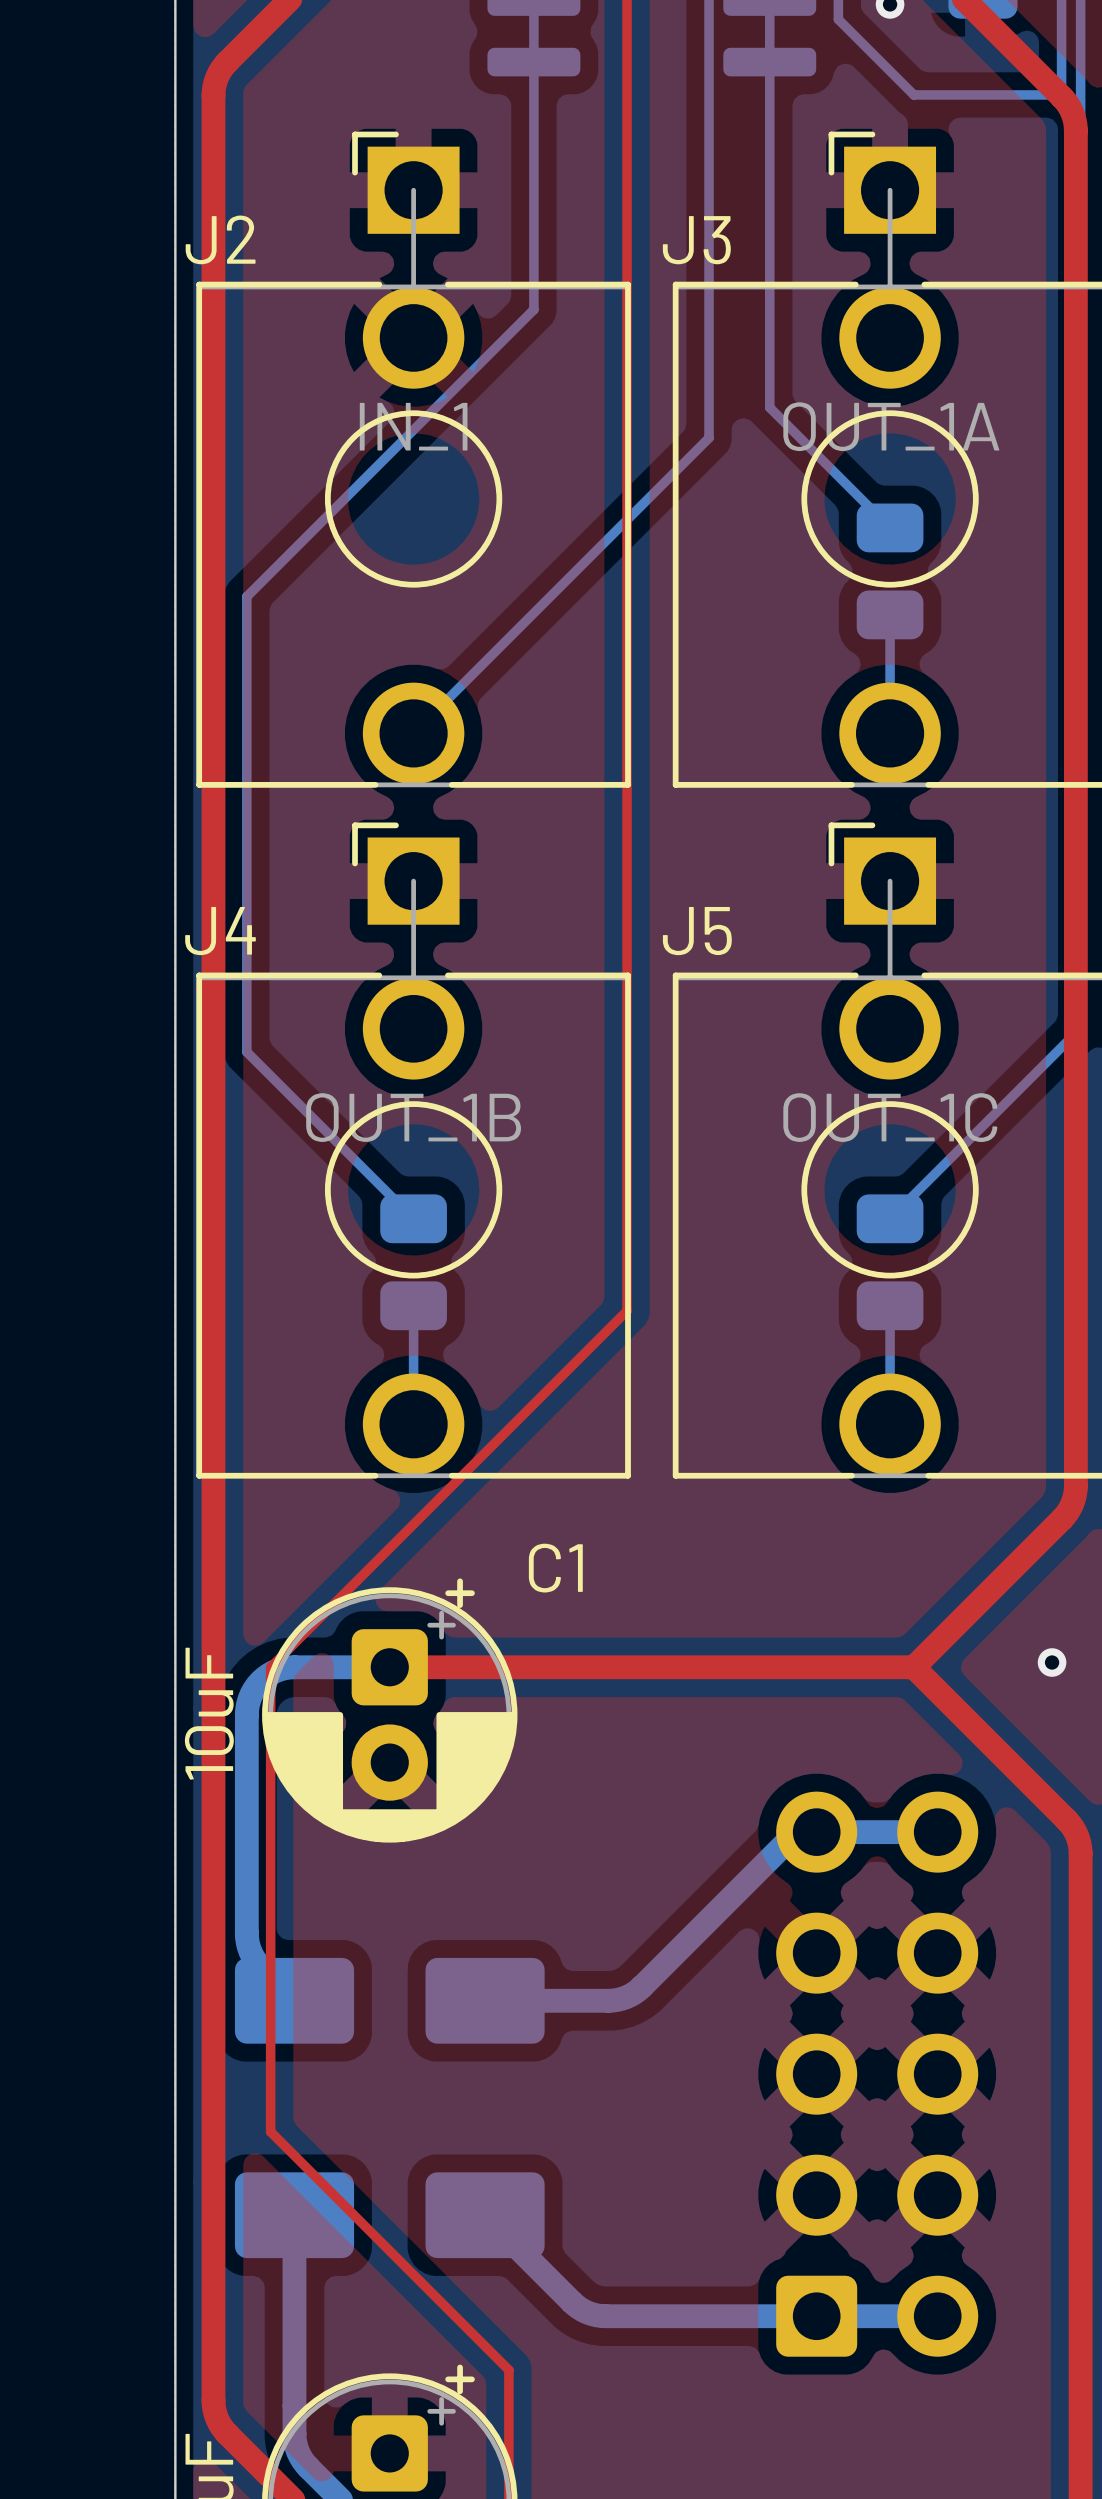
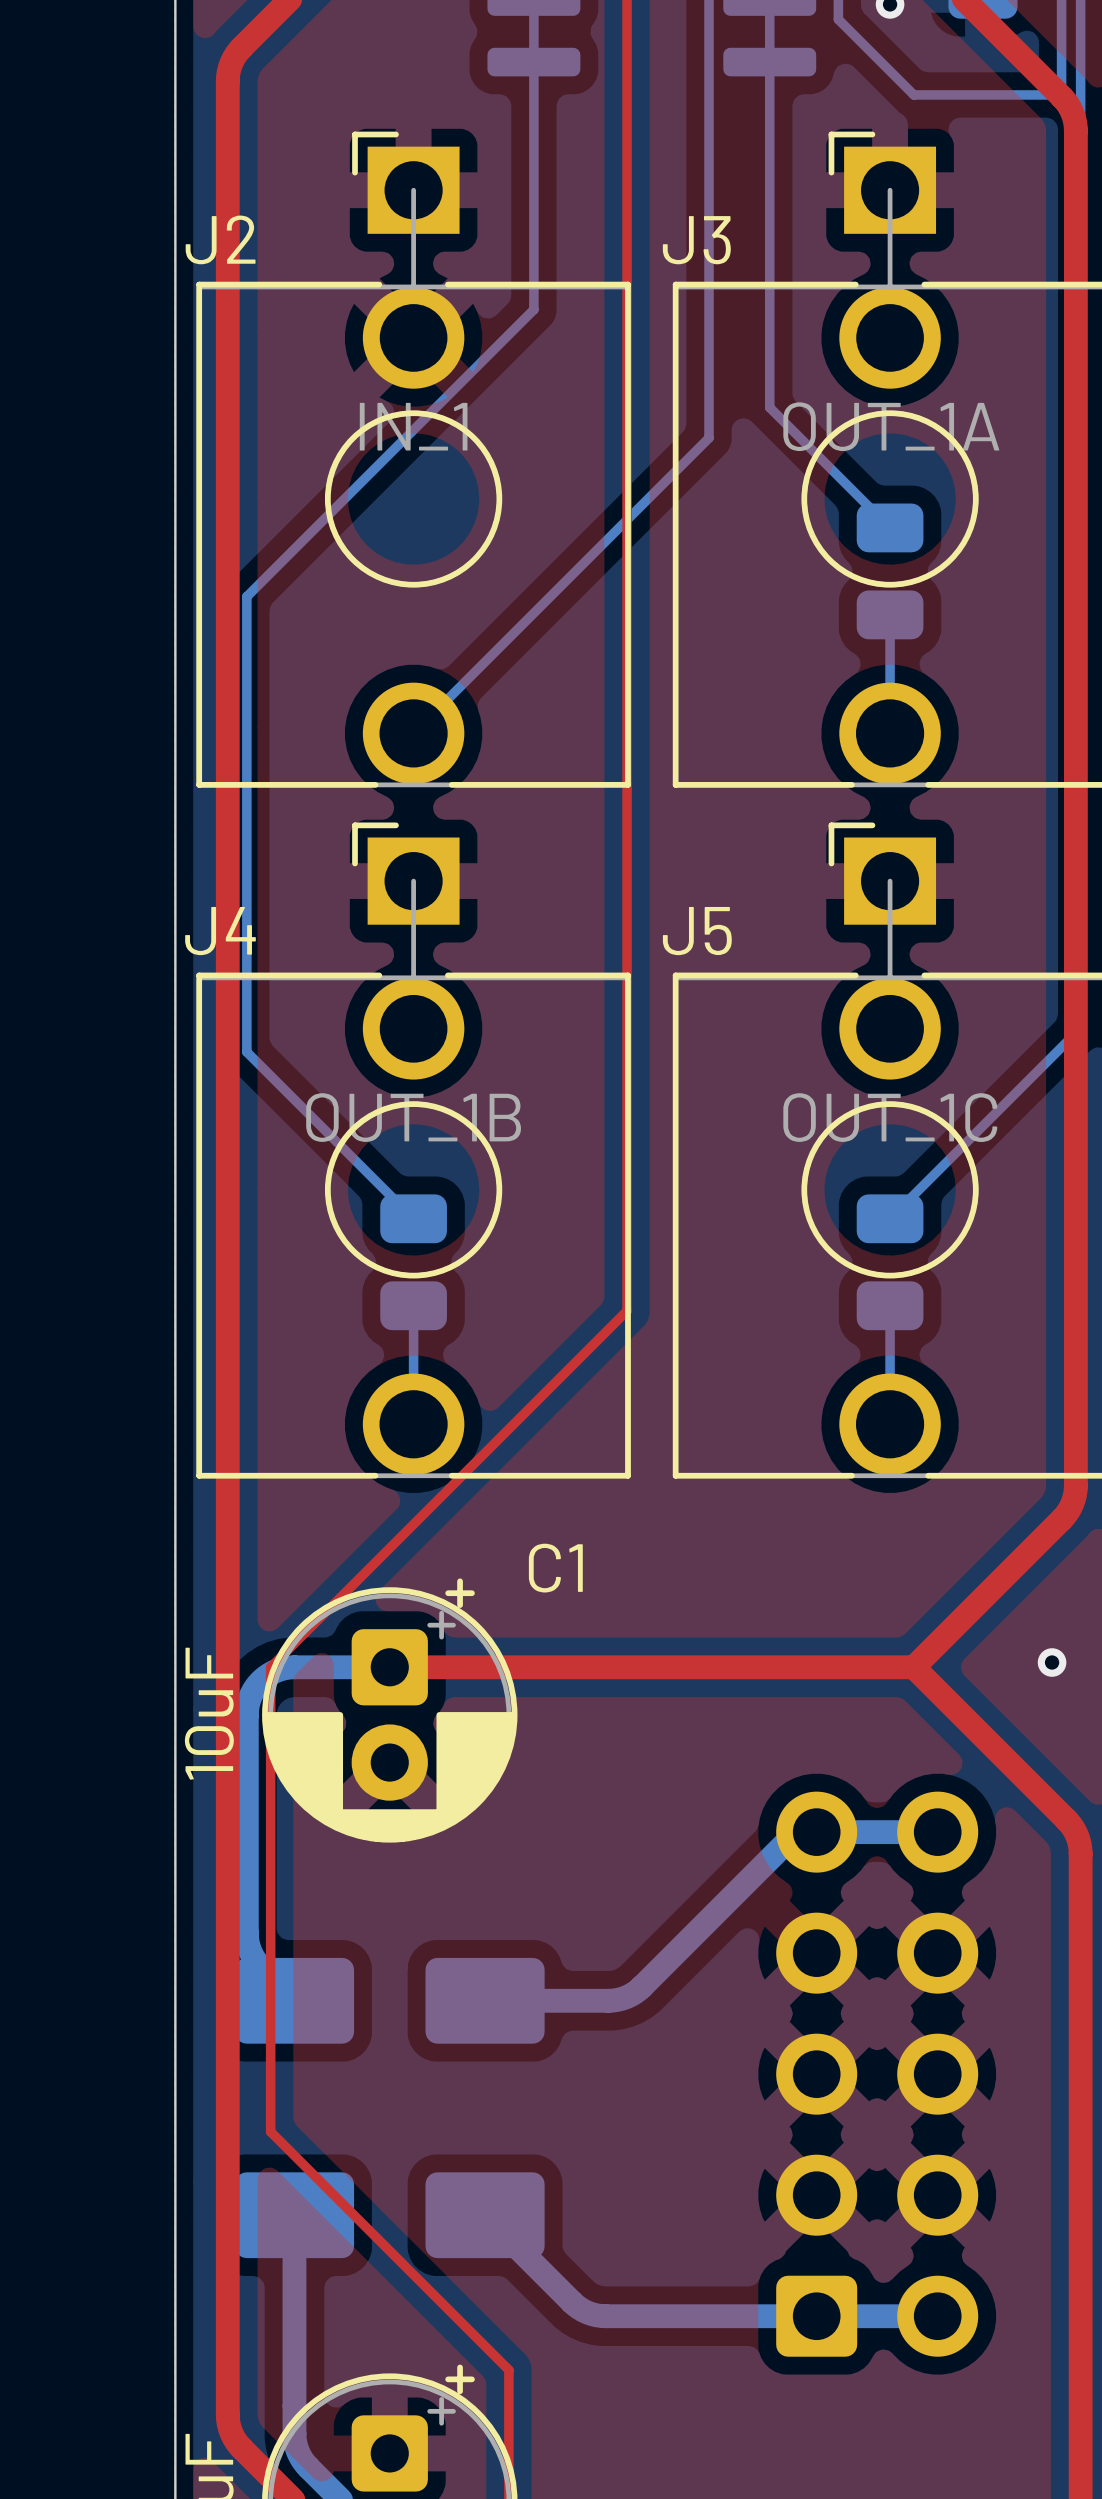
top track: (241, 47) (219, 73) (213, 95) (213, 2400) (219, 2422) (241, 2448) -> (241, 47) (231, 63) (227, 81) (227, 2414) (231, 2432) (241, 2448)

